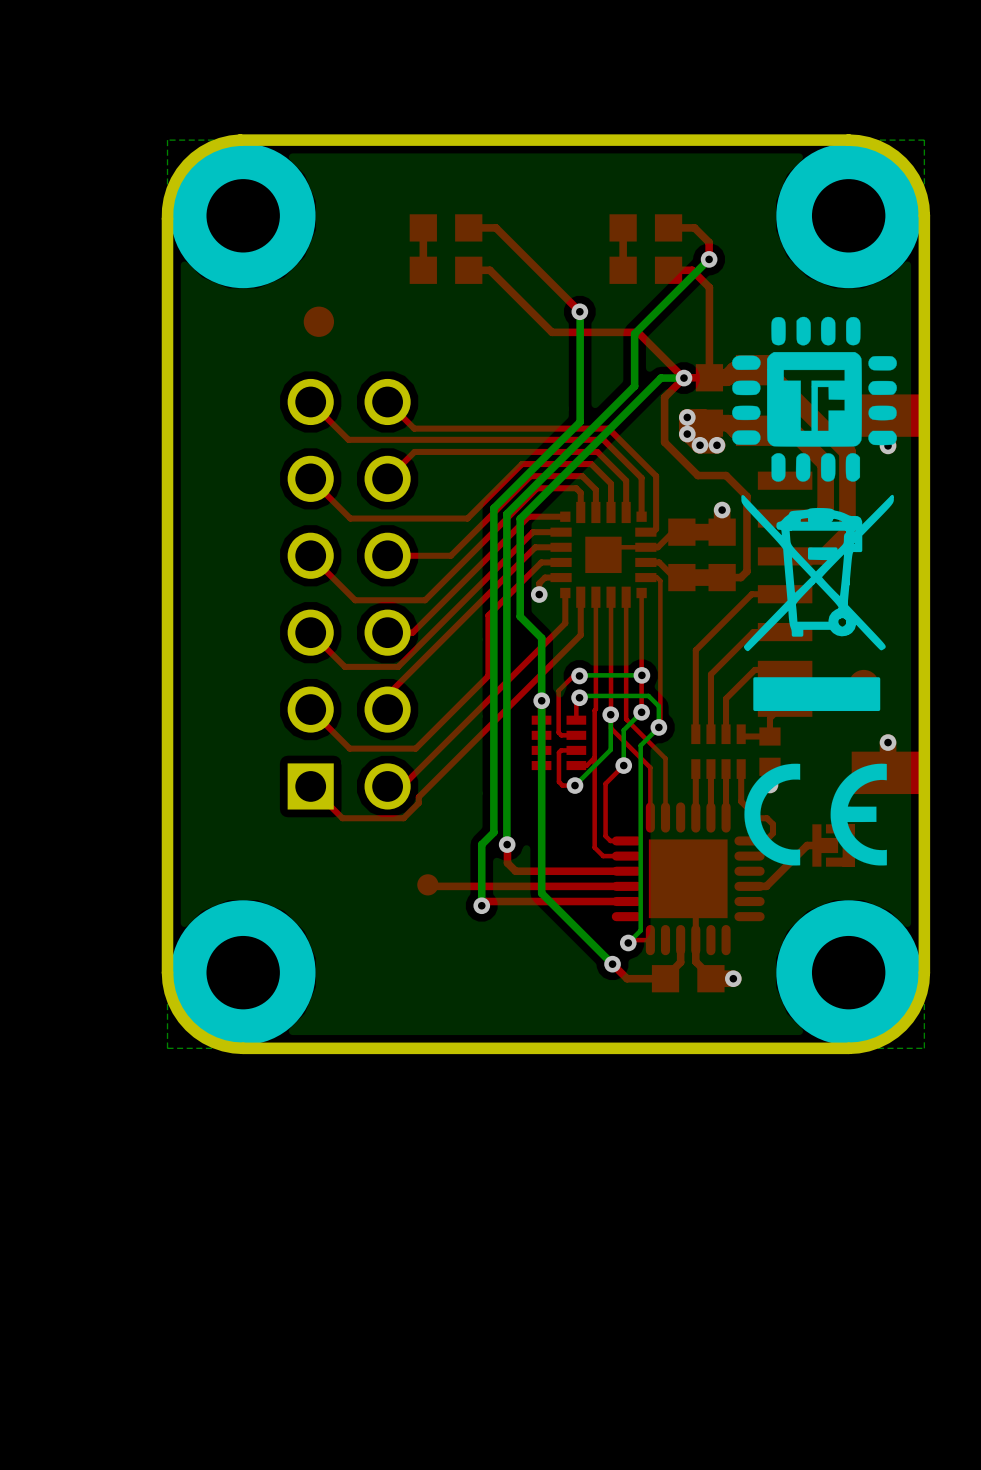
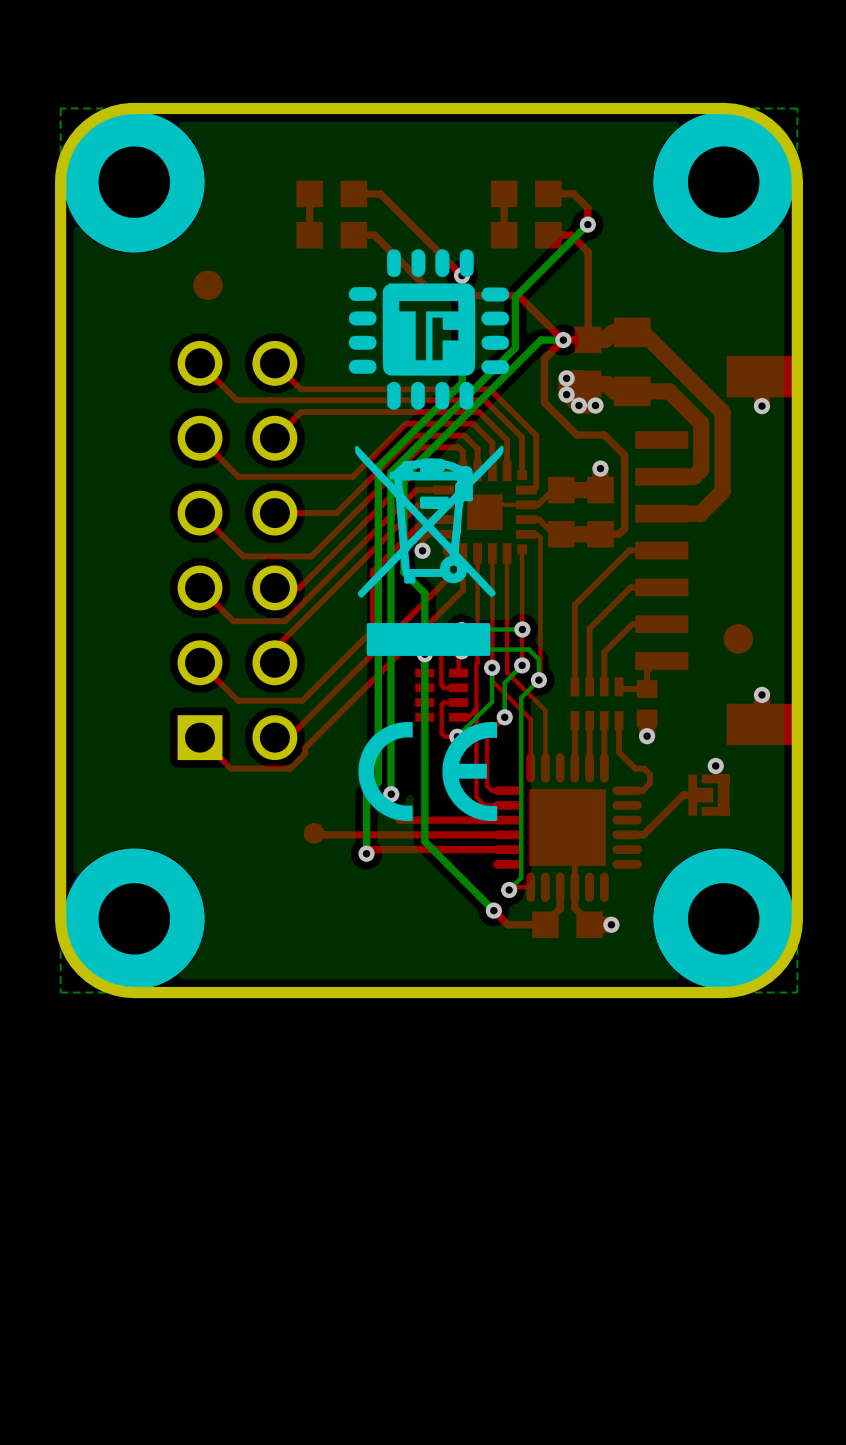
drawing position: (814, 399) -> (428, 329)
drawing position: (817, 602) -> (429, 550)
drawing position: (815, 814) -> (427, 771)

